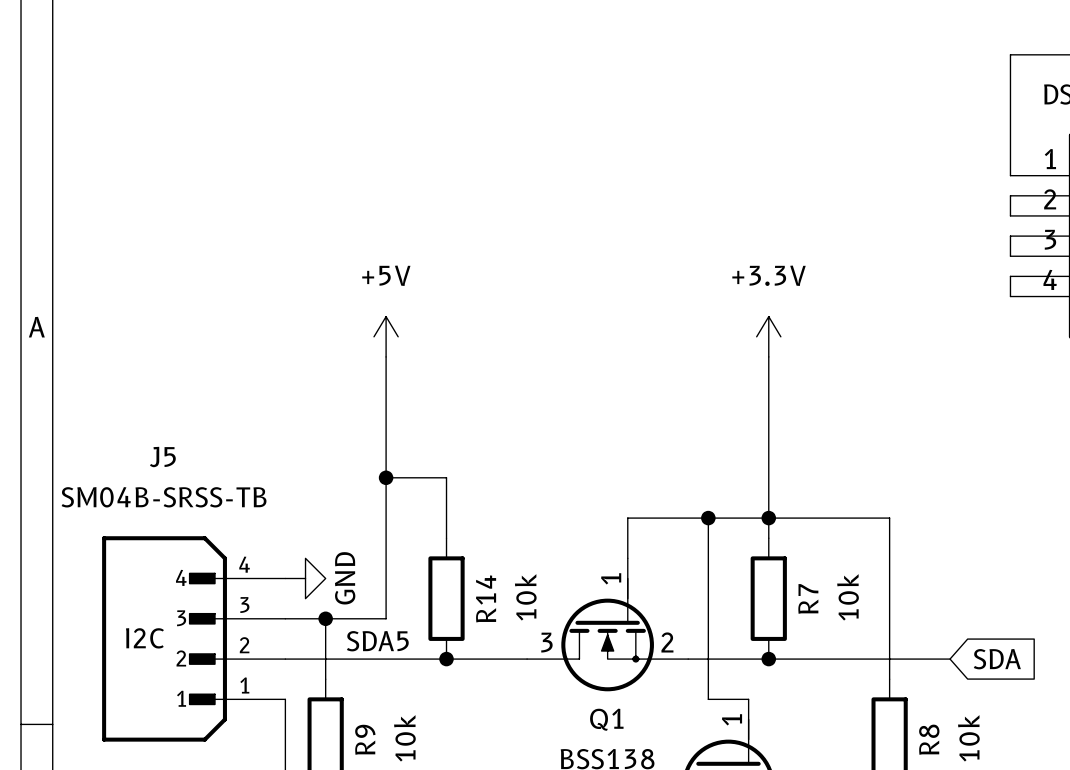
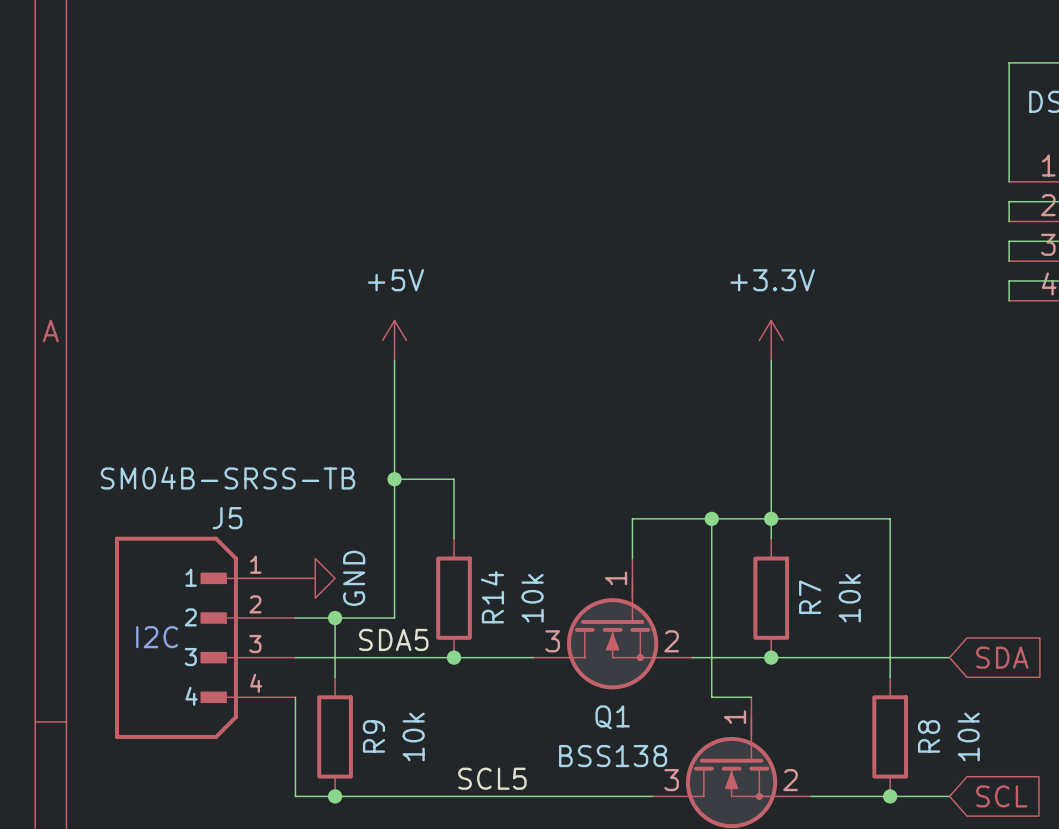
J5 name position: J5 (162, 457) -> J5 (227, 518)
J5 value position: SM04B-SRSS-TB (164, 497) -> SM04B-SRSS-TB (228, 478)
J5 flip: as is (164, 638) -> up-down (176, 637)

